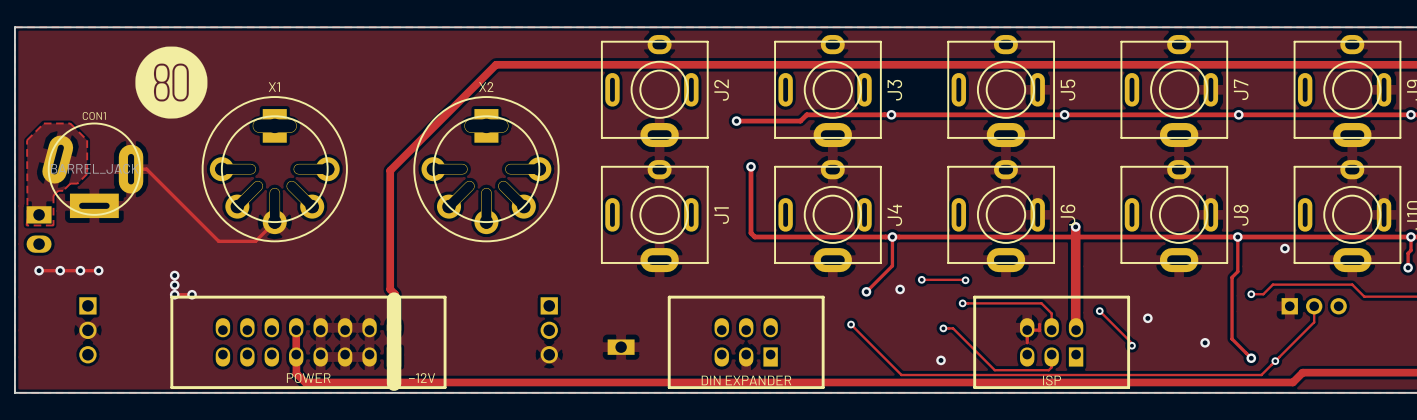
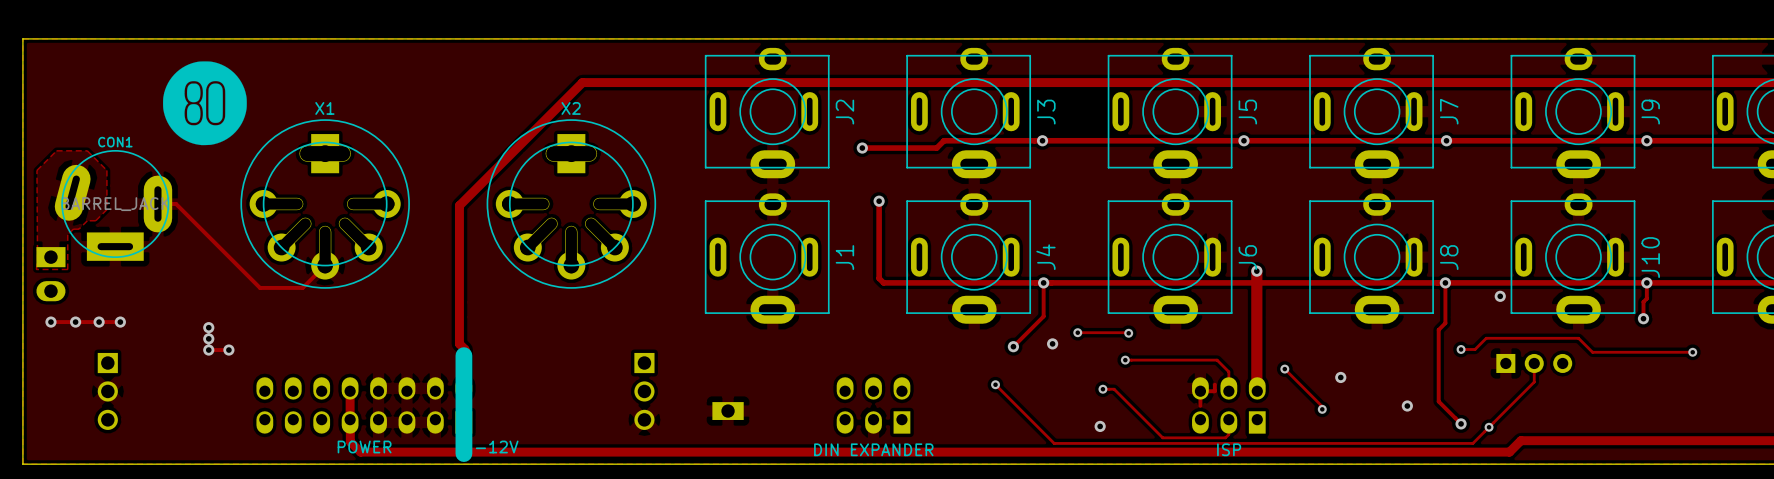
line: (669, 297) (823, 297) (823, 387) (669, 387) (669, 297) -> none
line: (974, 297) (974, 387) (1128, 387) (1128, 297) (974, 297) -> none
line: (171, 387) (445, 387) (445, 297) (171, 297) (171, 387) -> none

